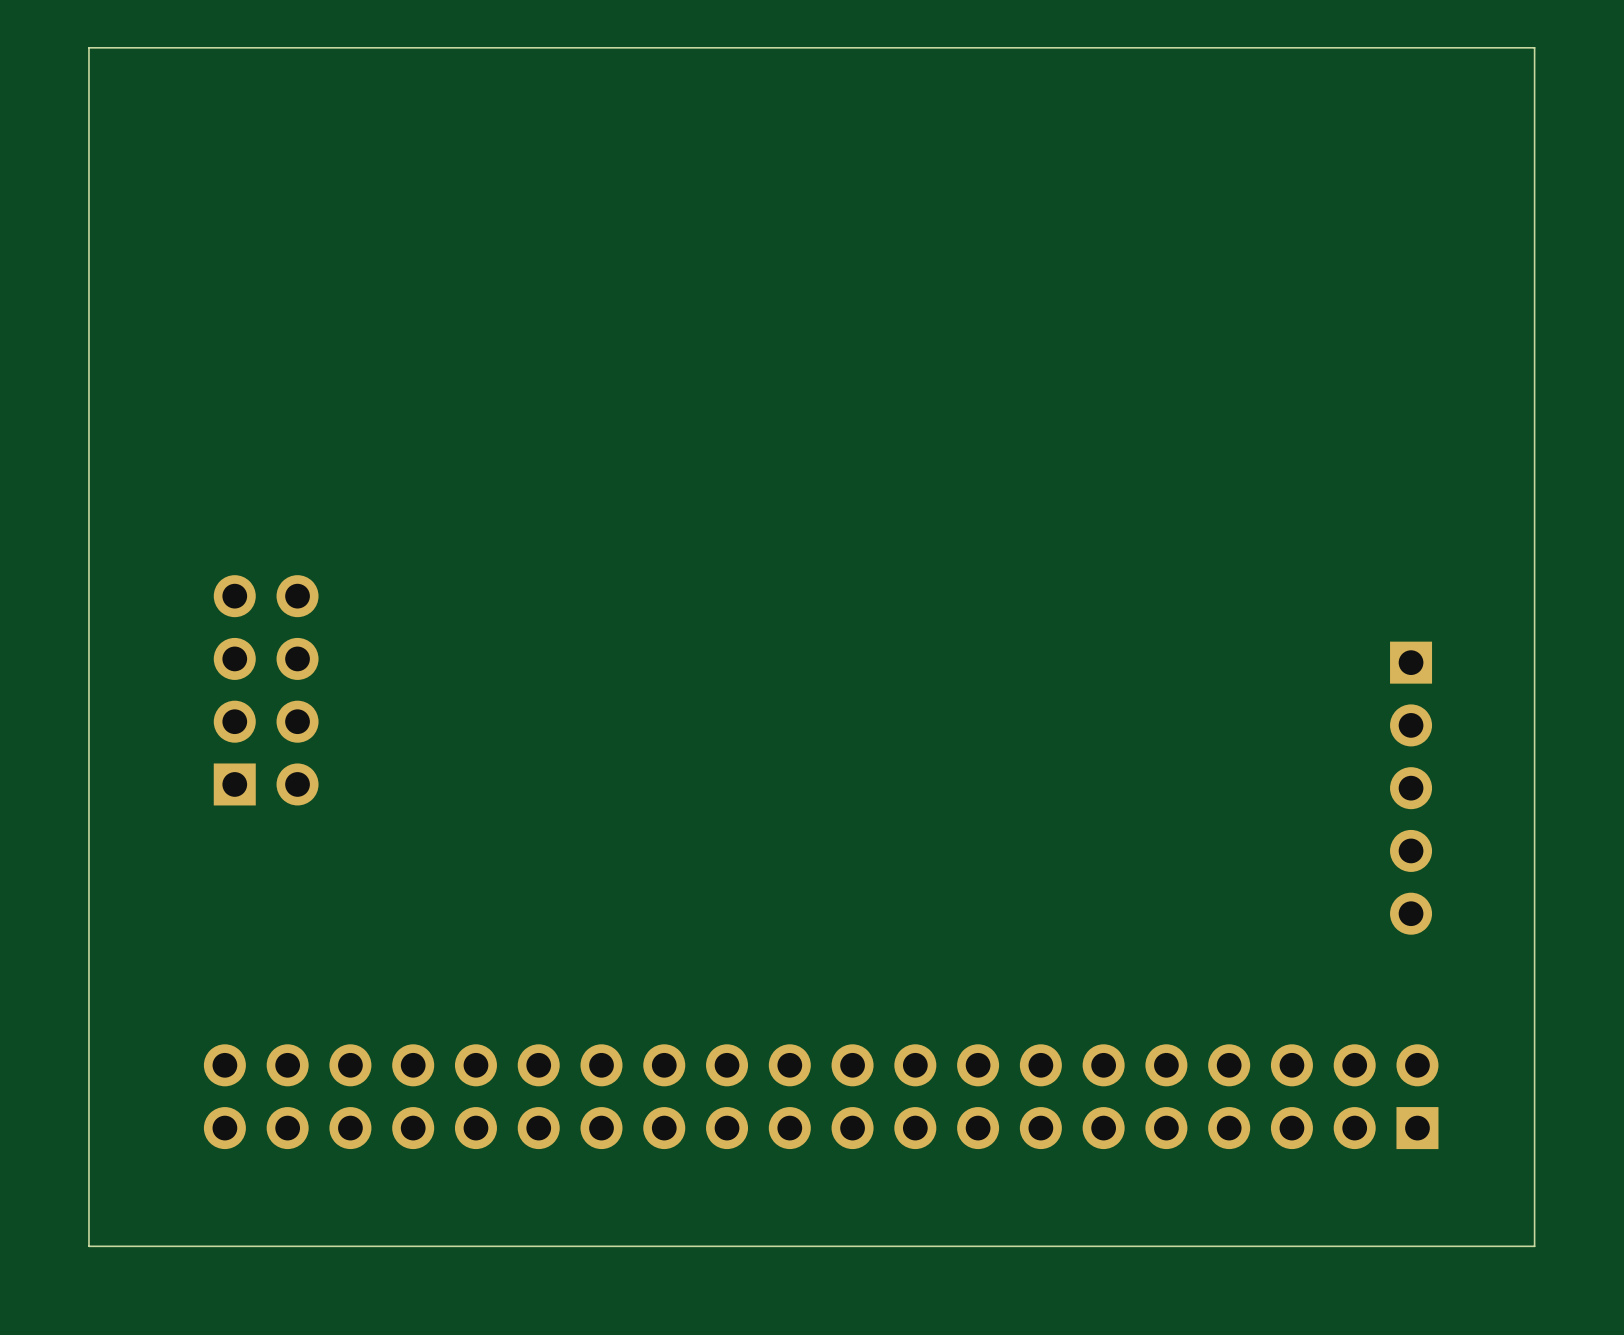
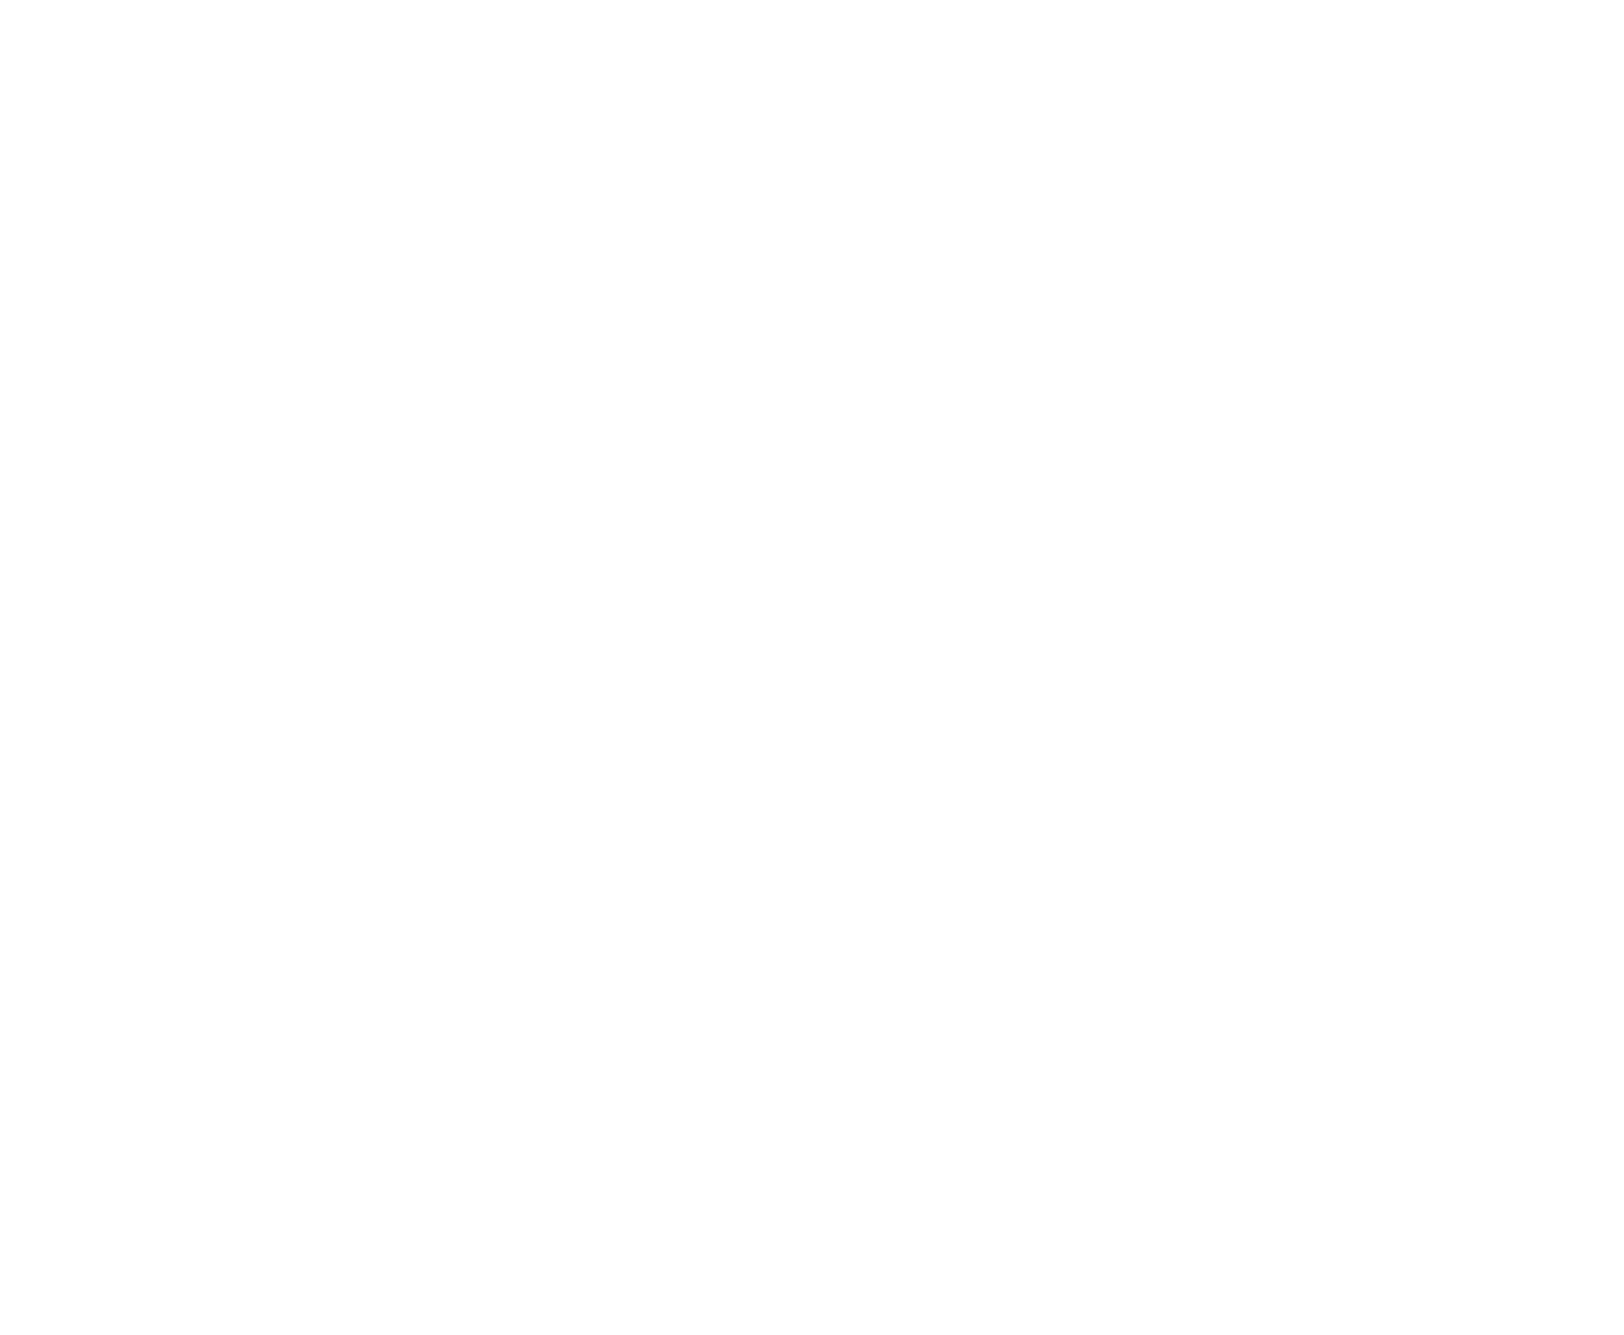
board edge: (1534, 47) (88, 47) (88, 1246) (1534, 1246) (1534, 47) -> none
part: (266, 690) -> none
part: (1411, 788) -> none
part: (821, 1096) -> none

